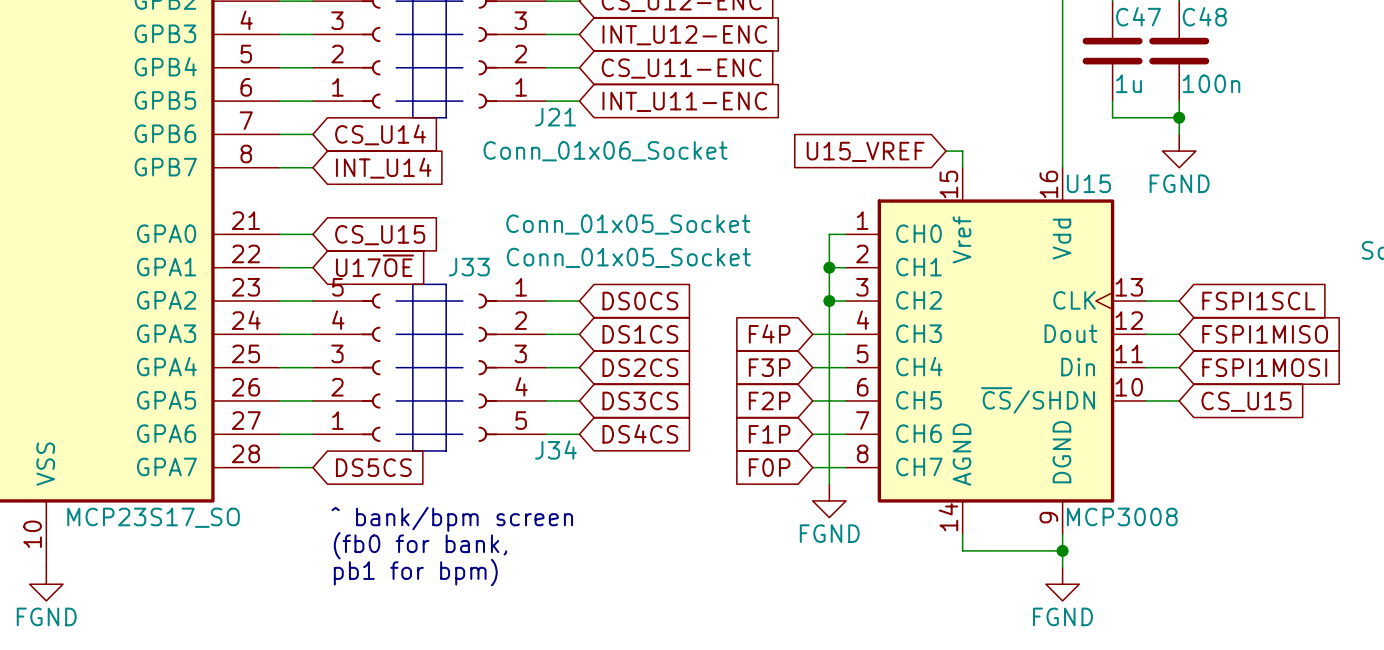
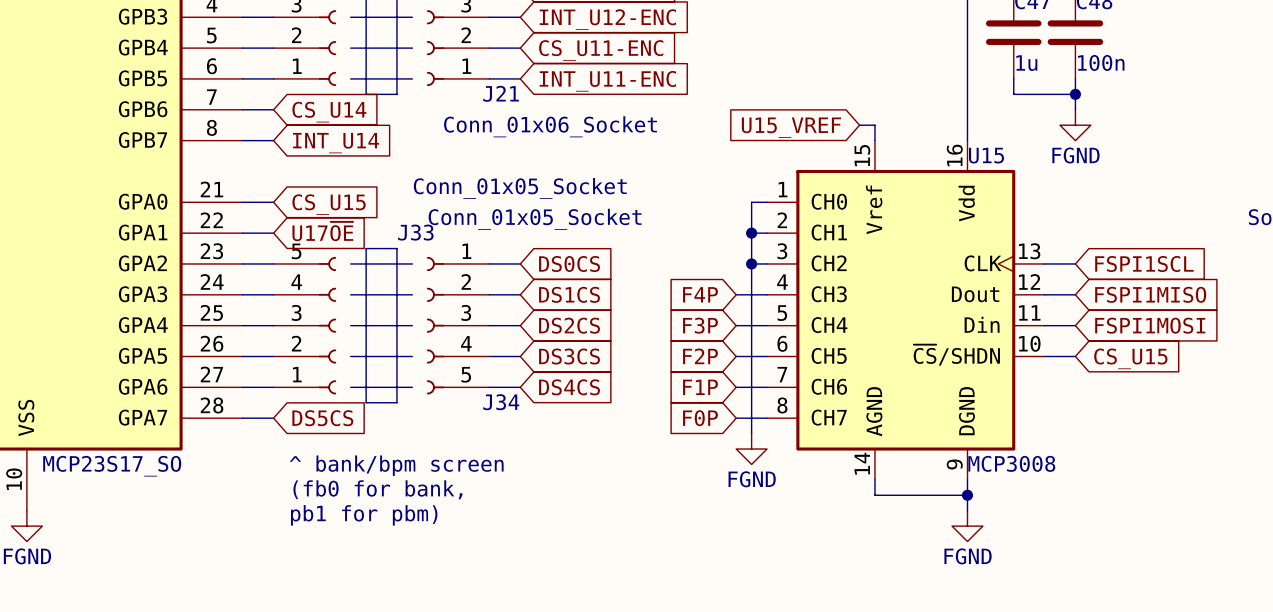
J33 value position: Conn_01x05_Socket (628, 224) -> Conn_01x05_Socket (520, 188)
J34 value position: Conn_01x05_Socket (628, 257) -> Conn_01x05_Socket (535, 219)
text: pb1 for bpm) (415, 572) -> pb1 for pbm) (364, 515)

